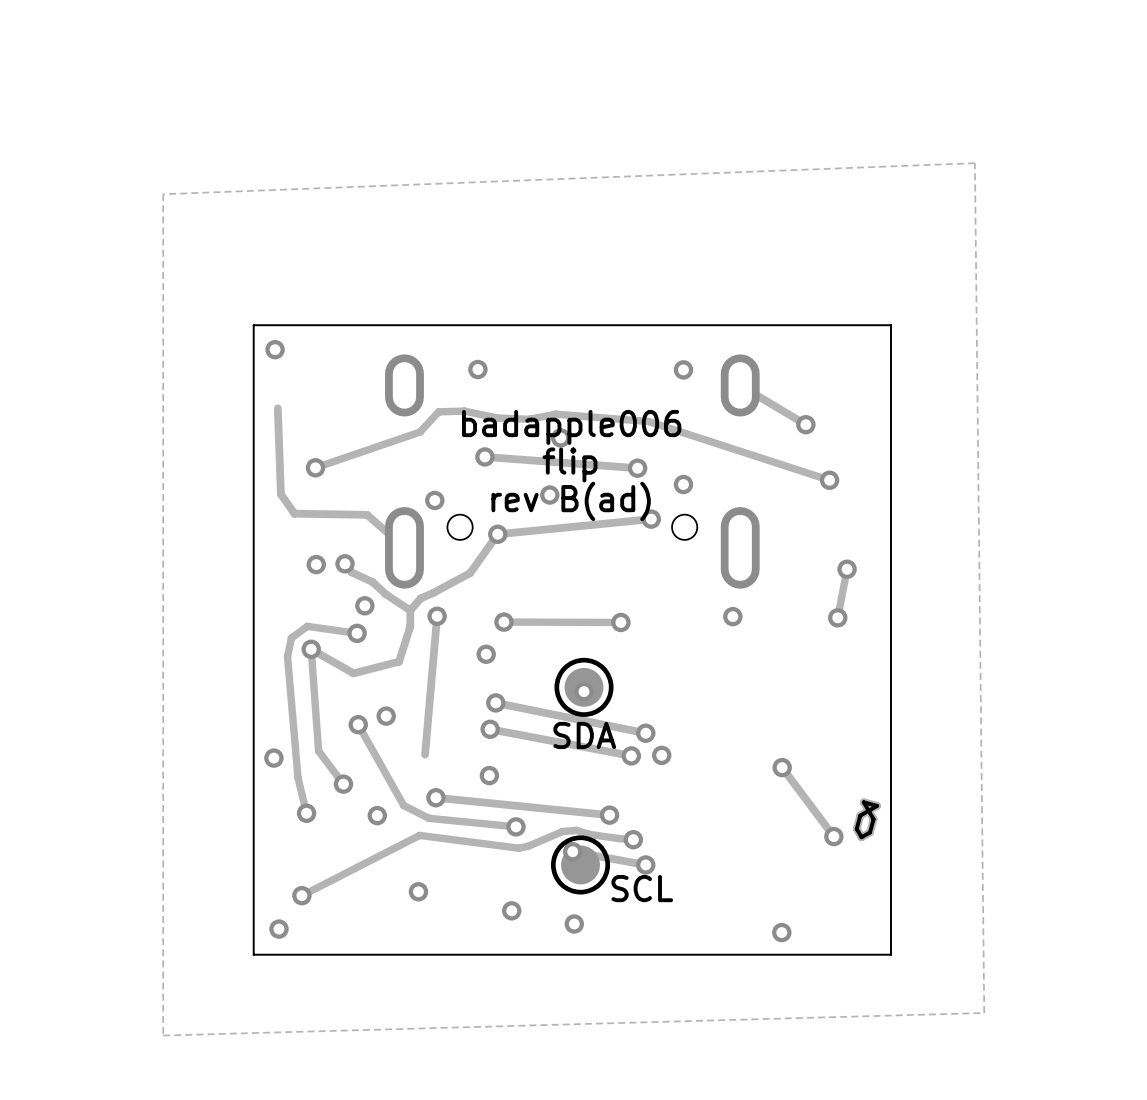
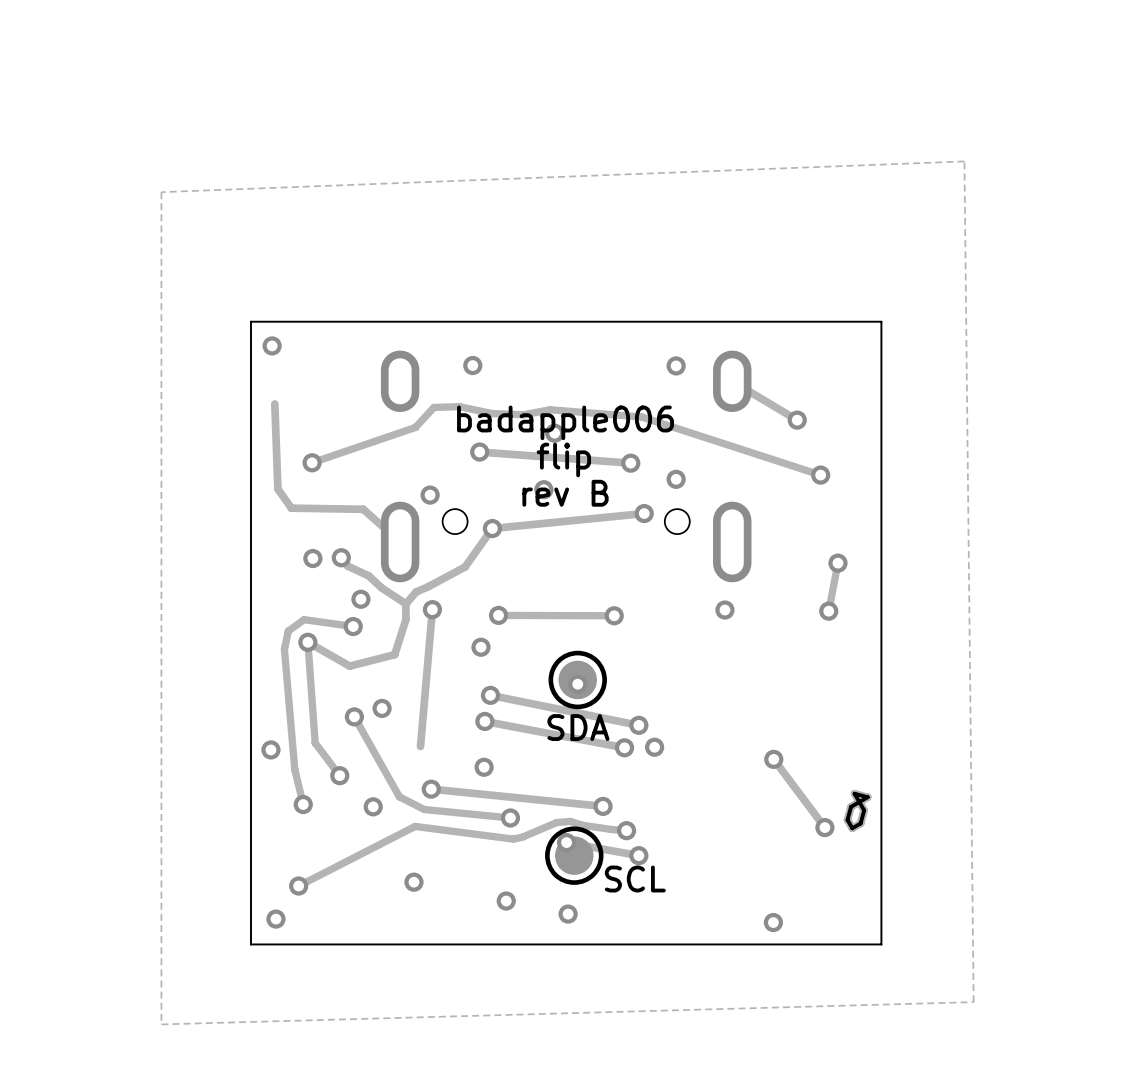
text: rev B(ad) (571, 501) -> rev B (565, 493)

